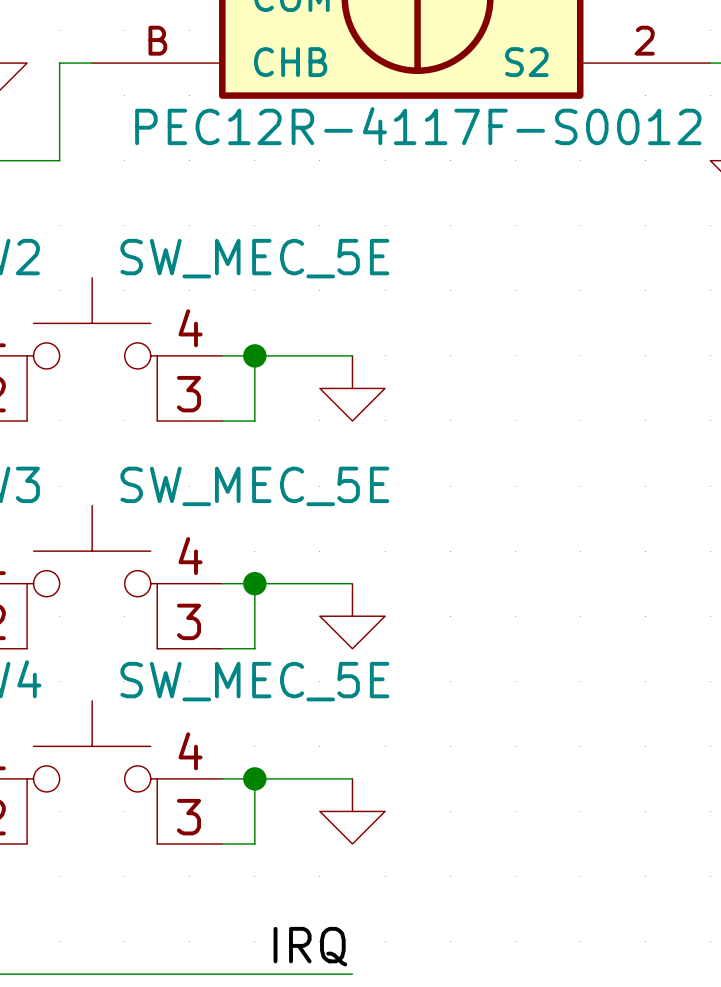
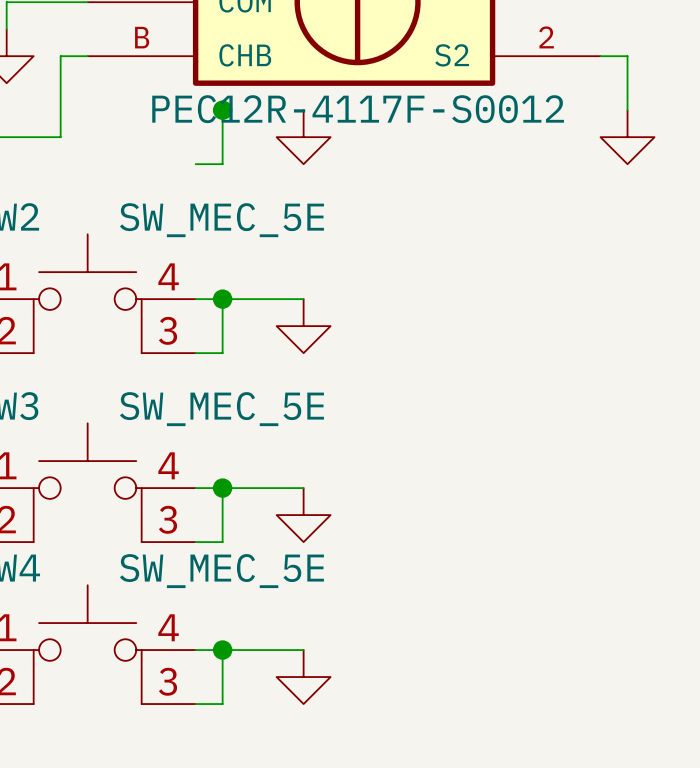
wire: none -> (222, 110) (222, 164) (195, 164)
junction: none -> (222, 110)
power symbol: none -> (303, 137)

